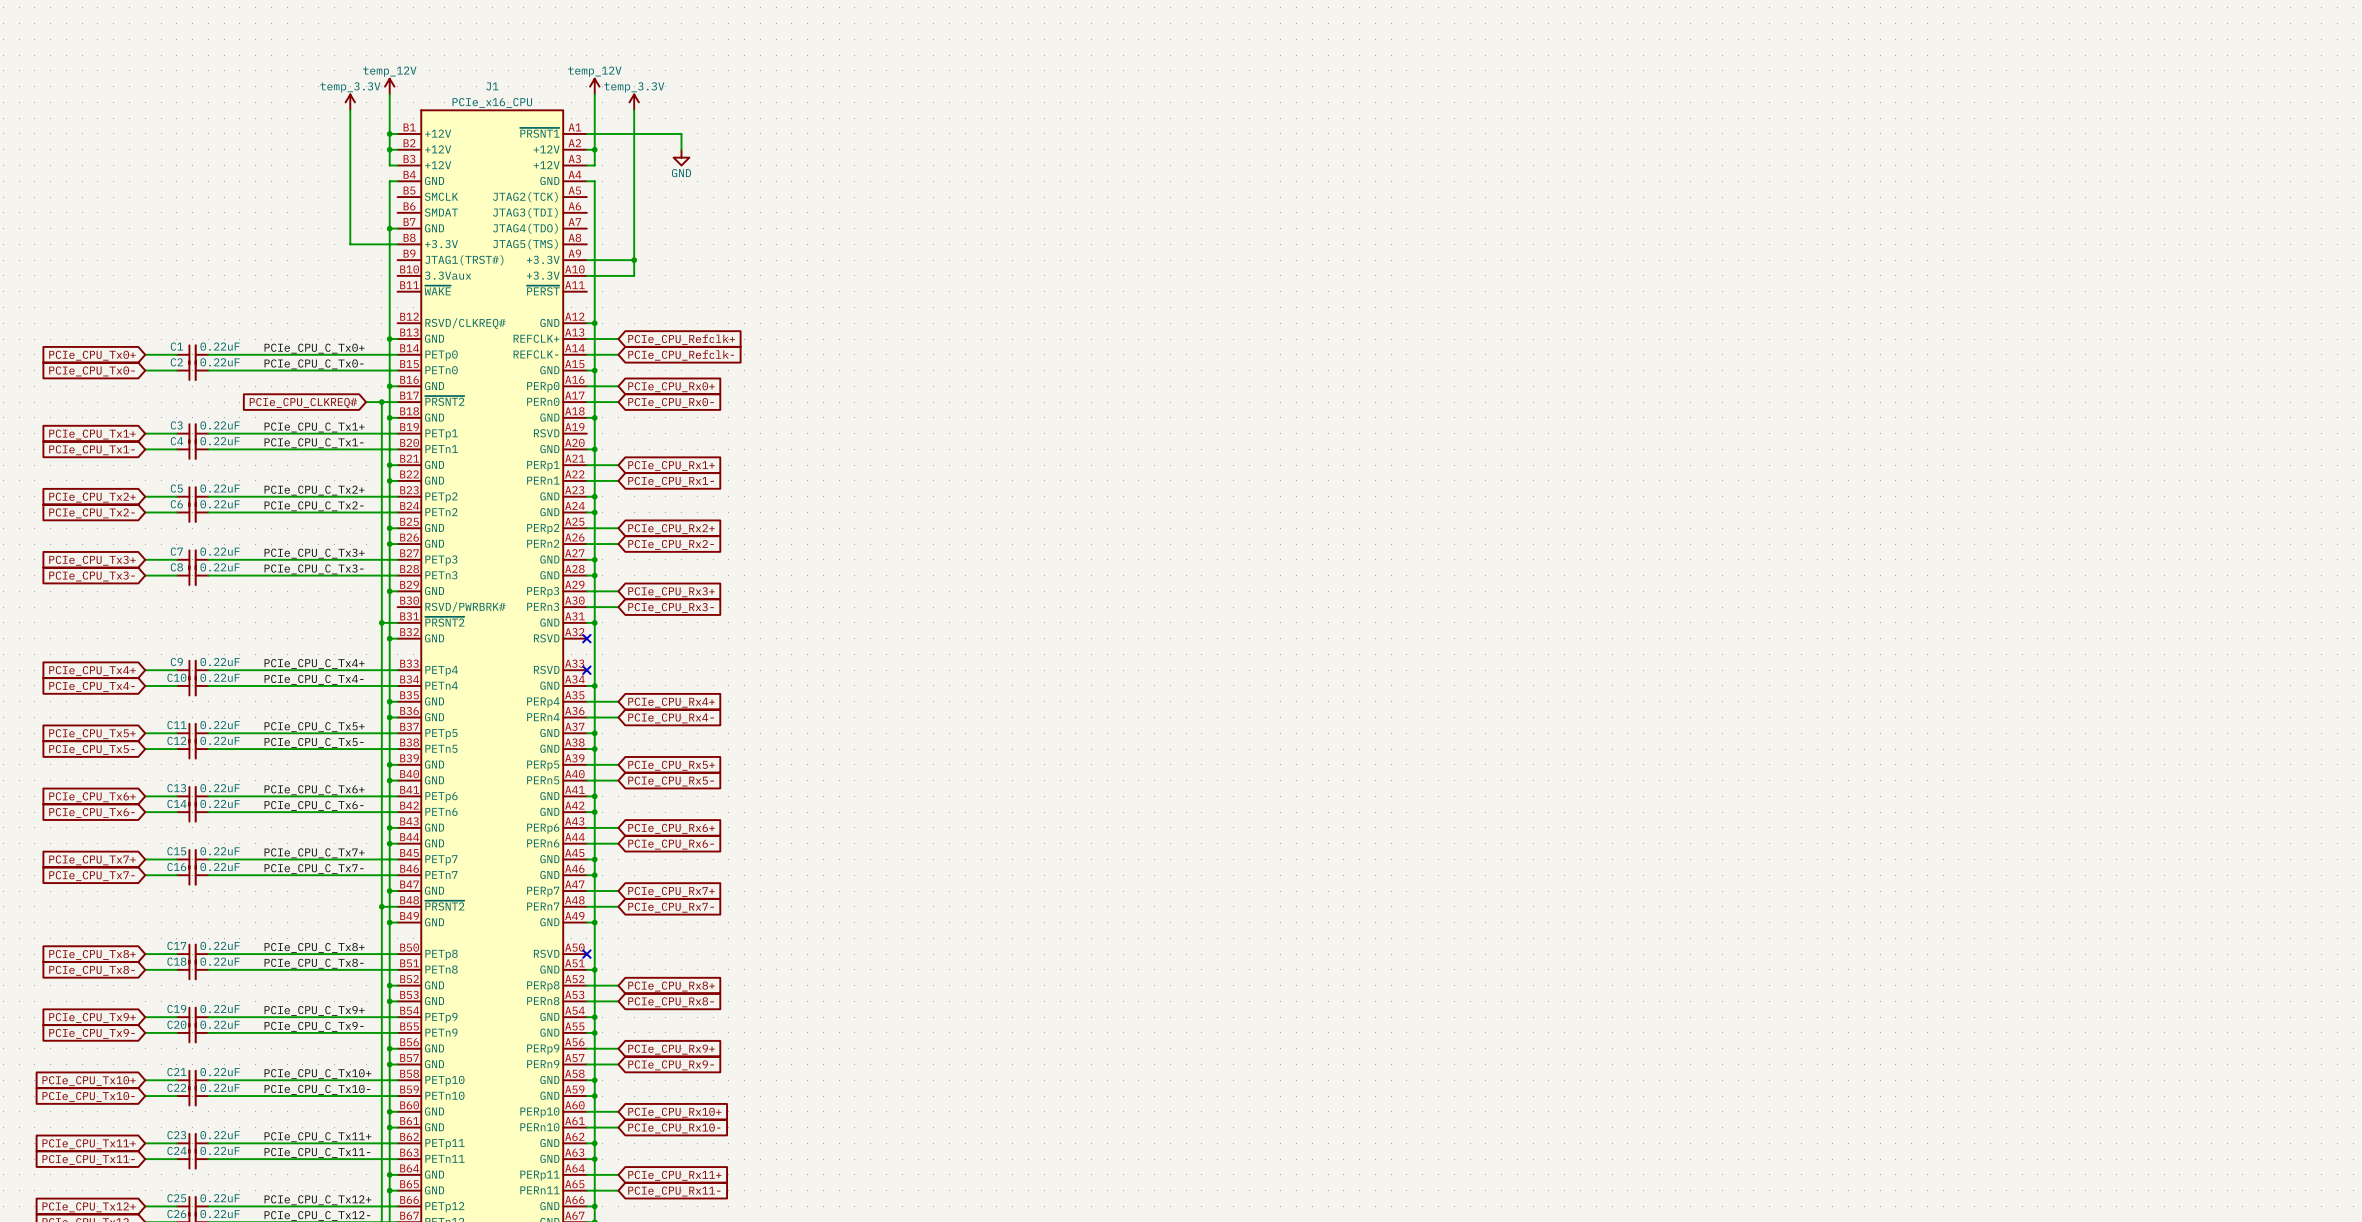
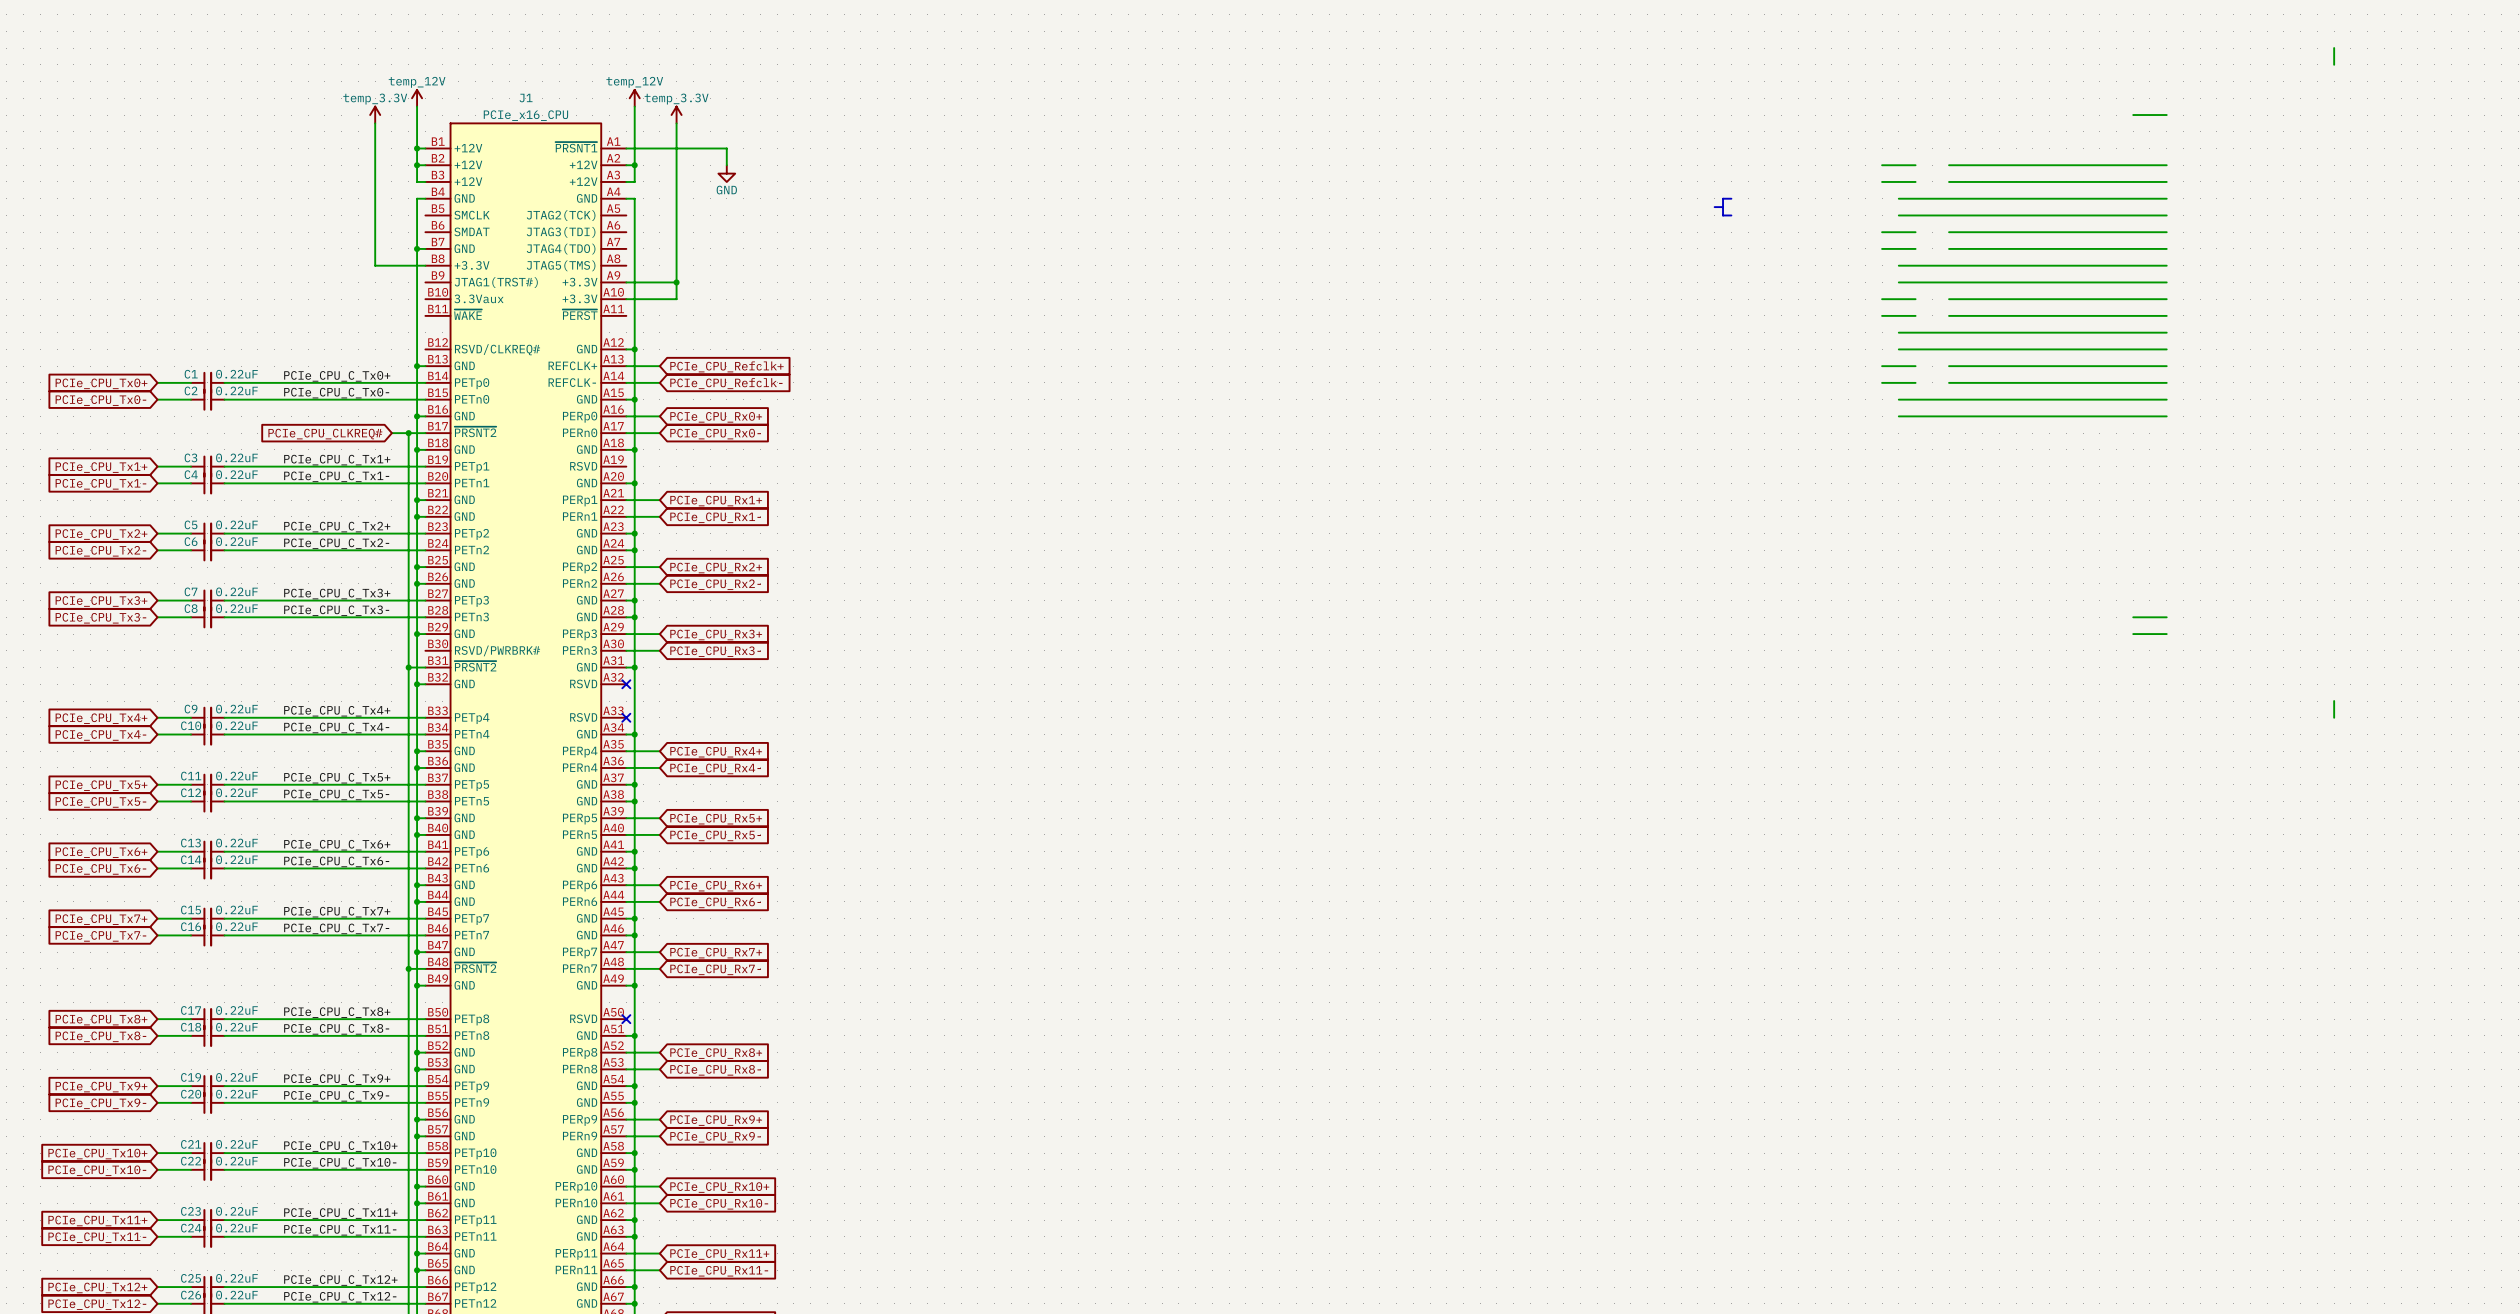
wire: none -> (2334, 48) (2334, 64)
wire: none -> (2133, 115) (2166, 115)
wire: none -> (1882, 165) (1915, 165)
wire: none -> (1949, 165) (2166, 165)
wire: none -> (1882, 181) (1915, 181)
wire: none -> (1949, 181) (2166, 181)
line: none -> (1731, 198) (1723, 198) (1723, 215) (1731, 215)
wire: none -> (1898, 198) (2166, 198)
line: none -> (1714, 207) (1723, 207)
wire: none -> (1898, 215) (2166, 215)
wire: none -> (1882, 232) (1915, 232)
wire: none -> (1949, 232) (2166, 232)
wire: none -> (1882, 248) (1915, 248)
wire: none -> (1949, 248) (2166, 248)
wire: none -> (1898, 265) (2166, 265)
wire: none -> (1898, 282) (2166, 282)
wire: none -> (1882, 299) (1915, 299)
wire: none -> (1949, 299) (2166, 299)
wire: none -> (1882, 315) (1915, 315)
wire: none -> (1949, 315) (2166, 315)
wire: none -> (1898, 332) (2166, 332)
wire: none -> (1898, 349) (2166, 349)
wire: none -> (1882, 366) (1915, 366)
wire: none -> (1949, 366) (2166, 366)
wire: none -> (1882, 382) (1915, 382)
wire: none -> (1949, 382) (2166, 382)
wire: none -> (1898, 399) (2166, 399)
wire: none -> (1898, 416) (2166, 416)
wire: none -> (2133, 617) (2166, 617)
wire: none -> (2133, 634) (2166, 634)
wire: none -> (2334, 701) (2334, 717)

